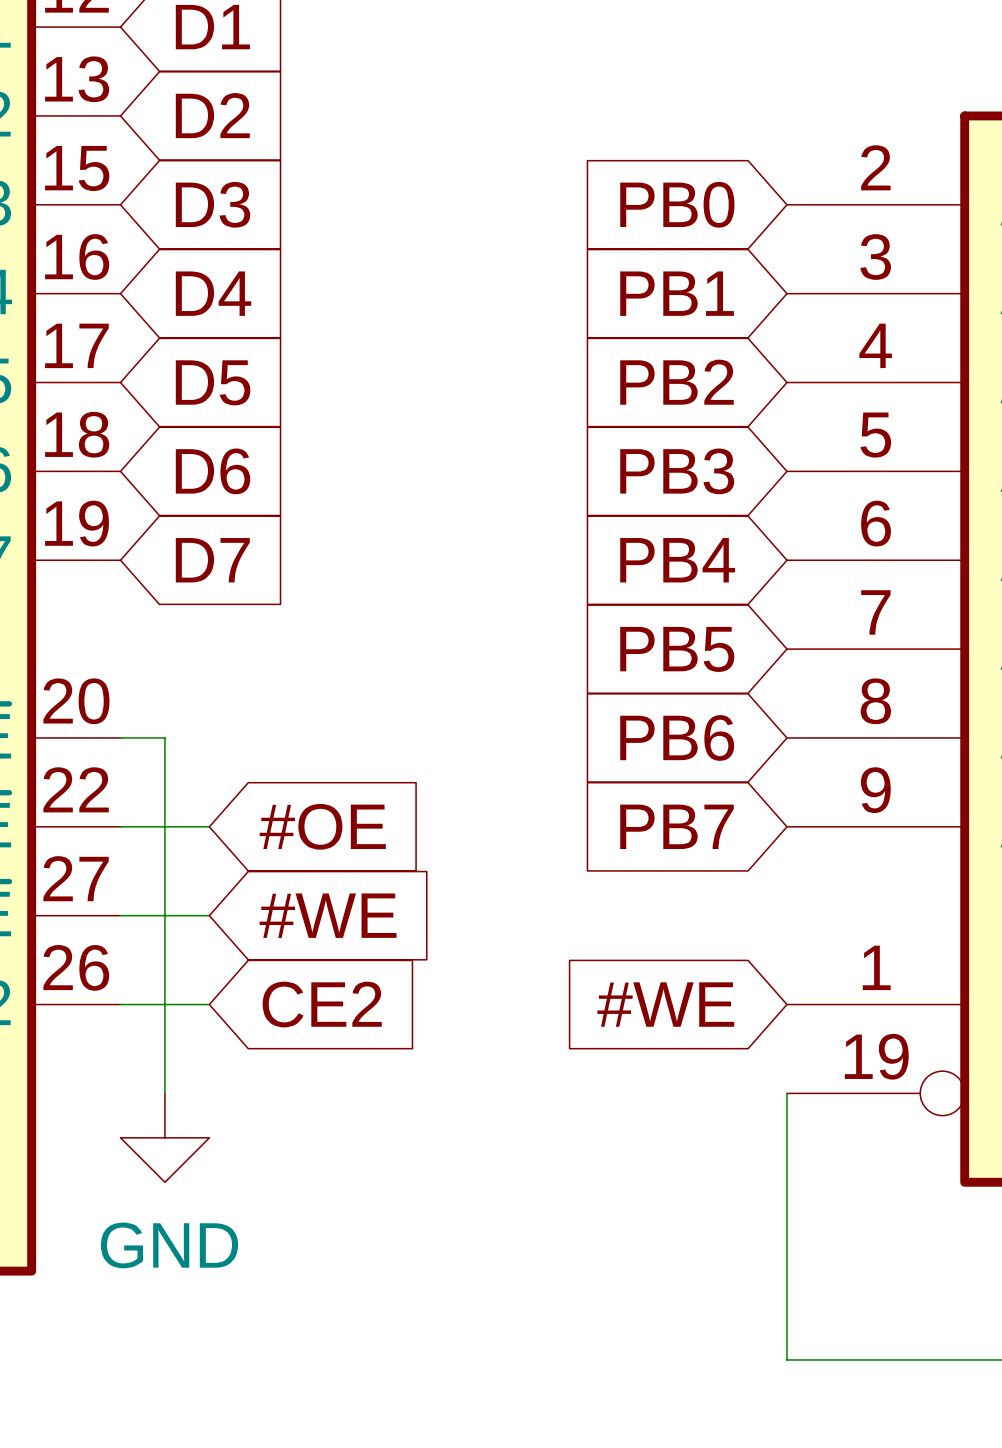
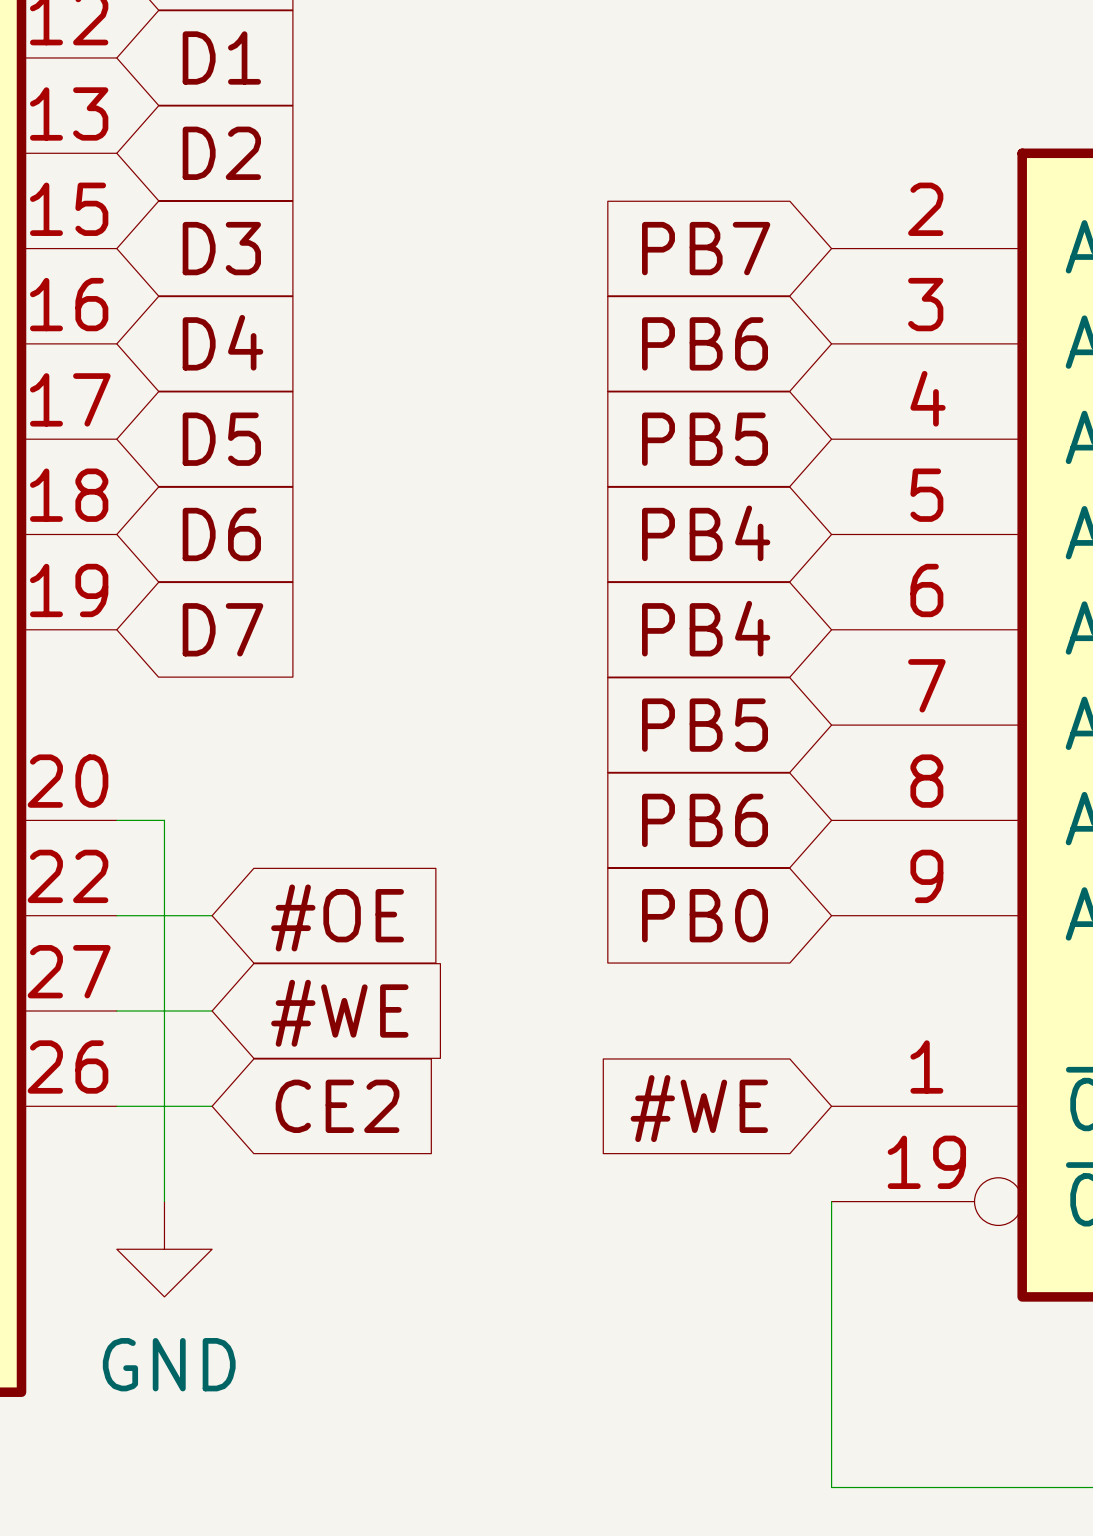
global label: PB0 (677, 204) -> PB7 (706, 248)
global label: PB1 (677, 293) -> PB6 (705, 343)
global label: PB2 (676, 382) -> PB5 (705, 439)
global label: PB3 (677, 471) -> PB4 (706, 533)
global label: PB7 (676, 826) -> PB0 (705, 915)

